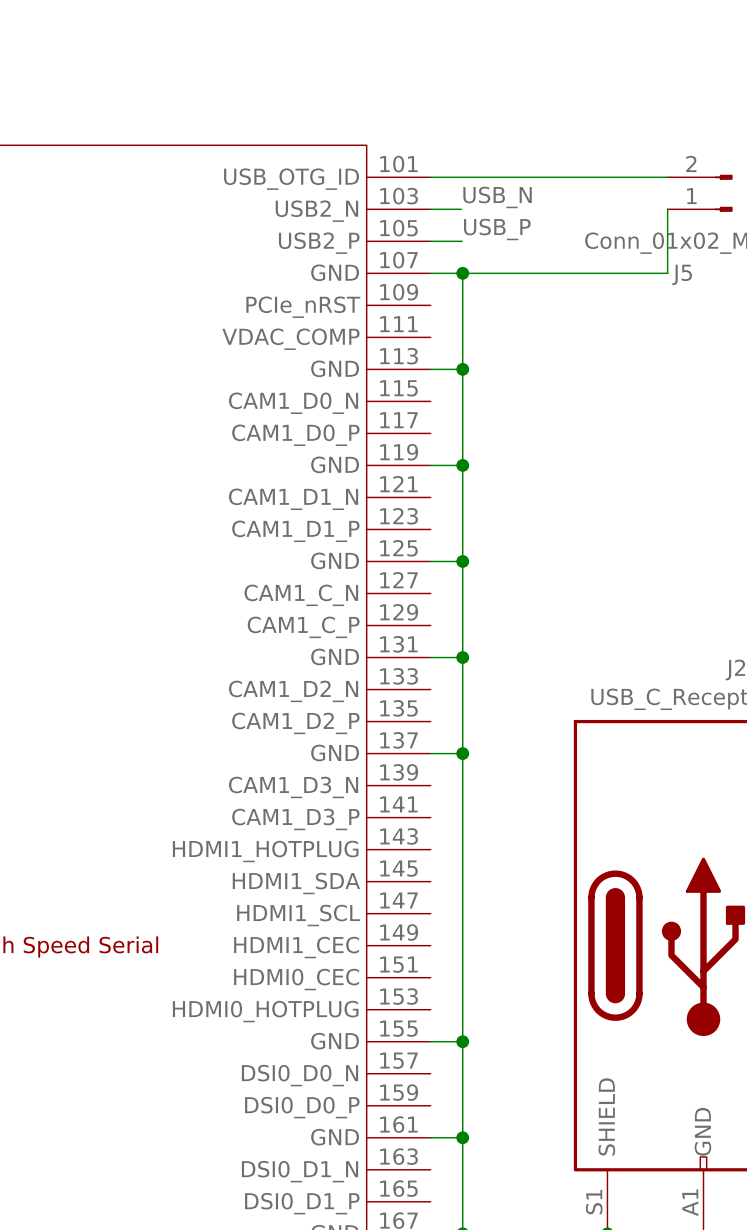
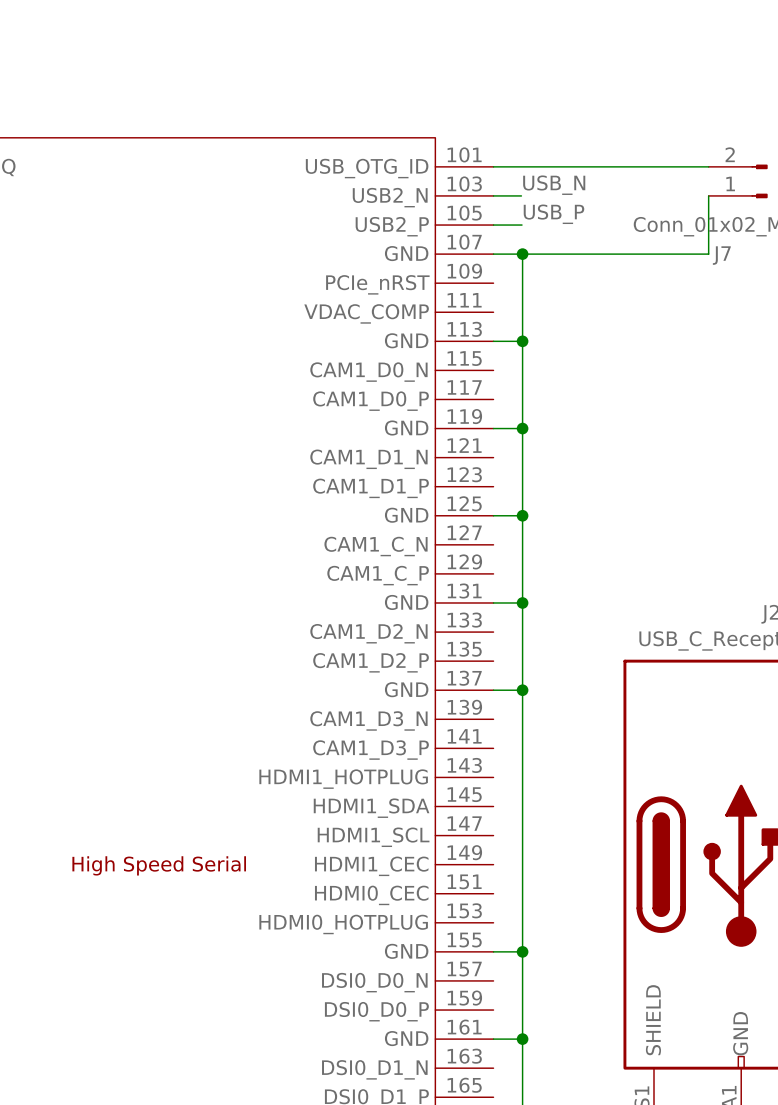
J5 name: J5 (682, 274) -> J7 (721, 255)

